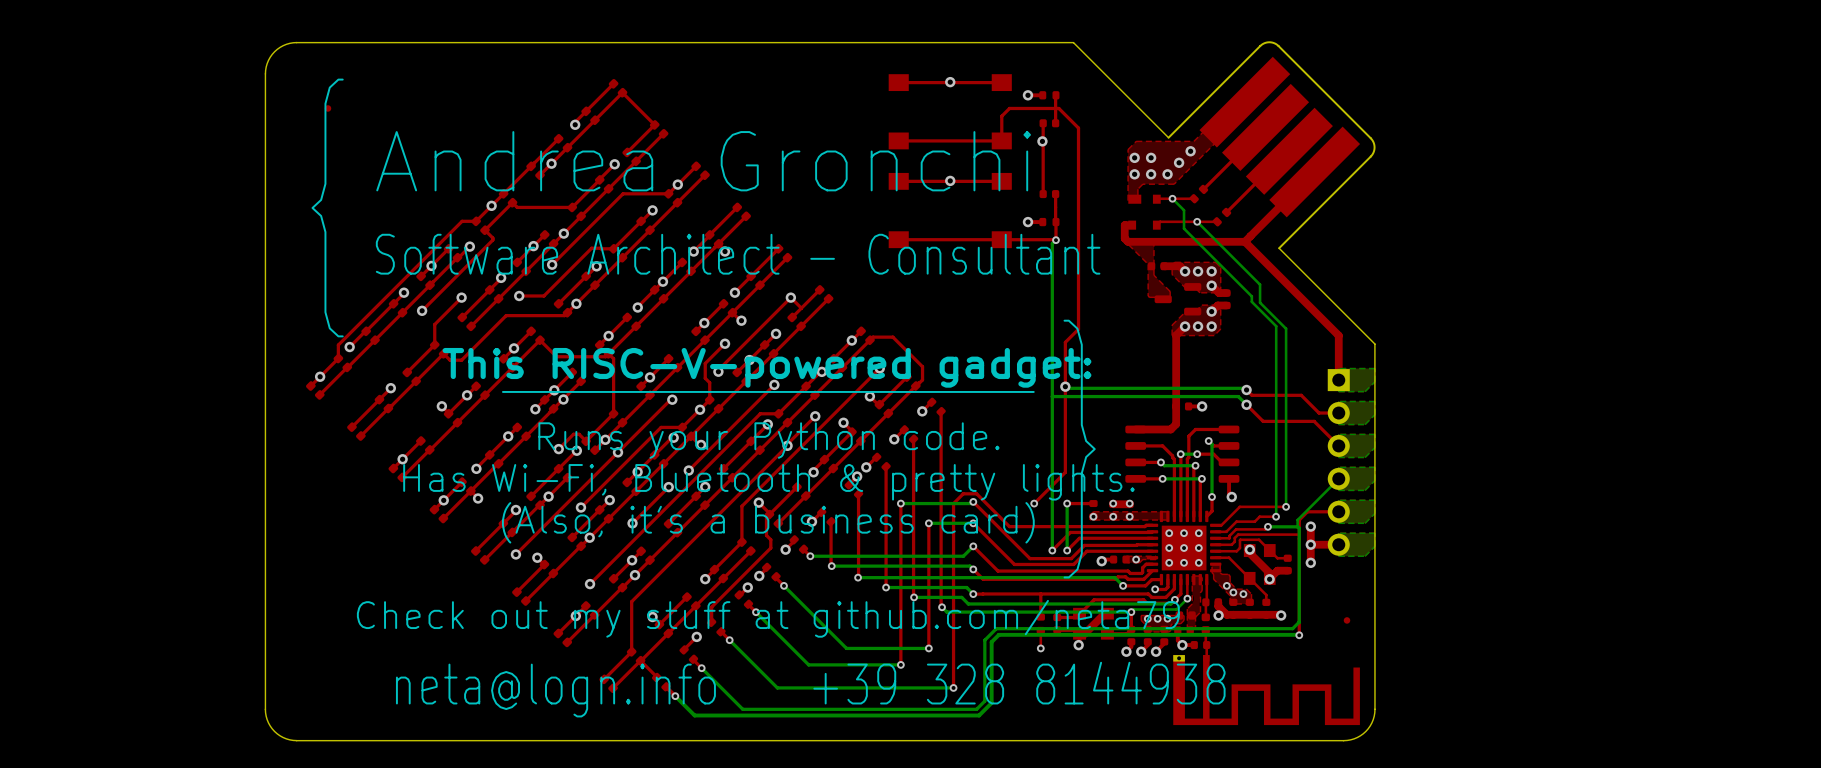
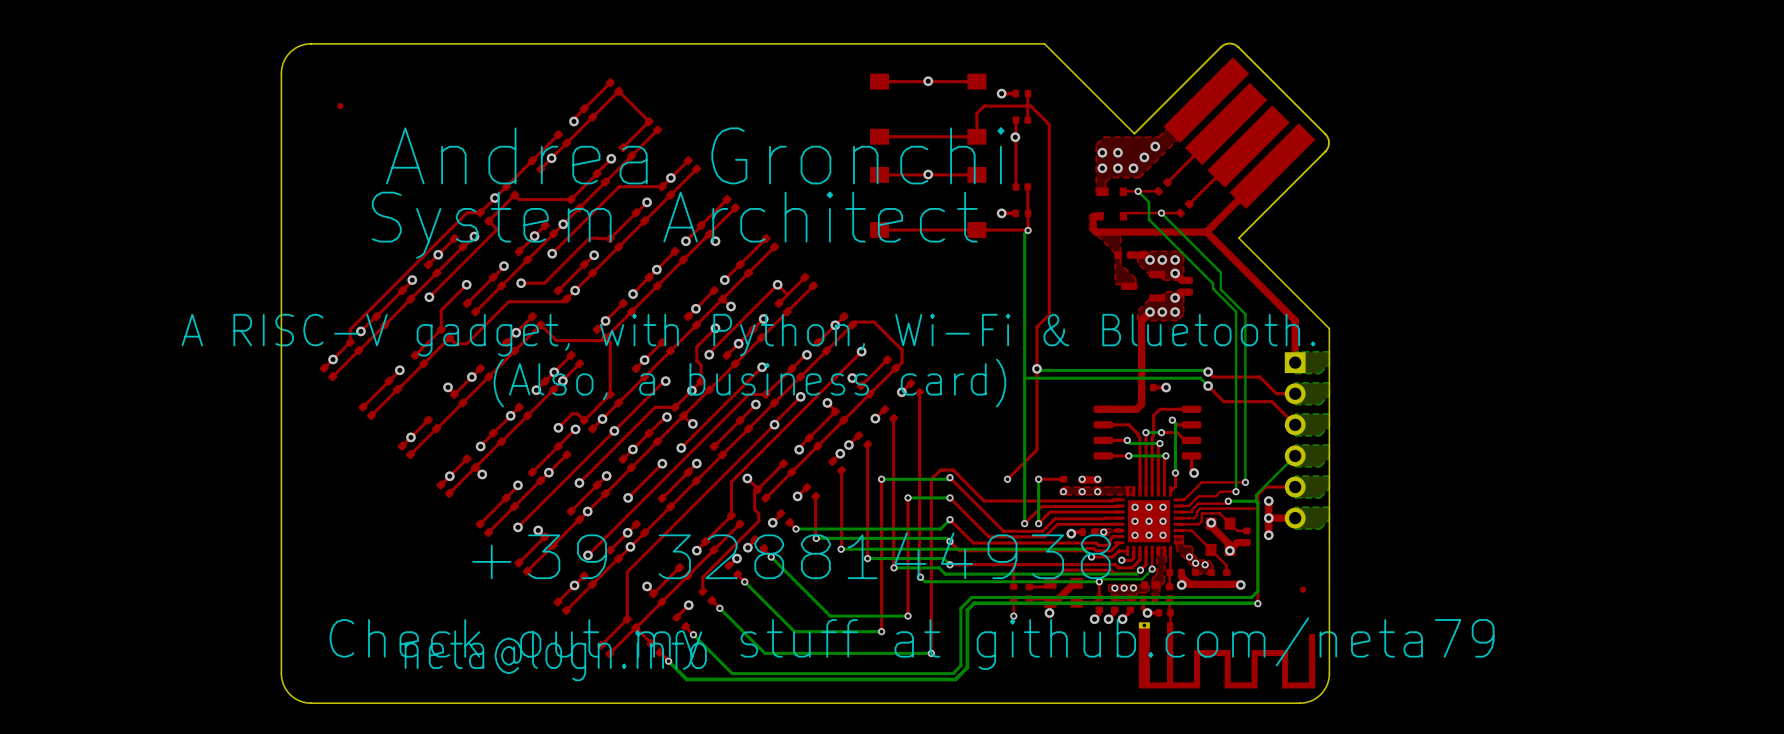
text: { (327, 207) -> none
text: none -> System Architect (674, 225)
text: Software Architect - Consultant (738, 254) -> none
text: none -> A RISC-V gadget, with Python, Wi-Fi & Bluetooth. (748, 335)
text: This RISC-V-powered gadget: (766, 367) -> none
line: (1033, 391) (502, 391) -> none
text: none -> (Also, a business card) (749, 383)
text: Runs your Python code. (768, 440) -> none
text: } (1079, 449) -> none
text: Has Wi-Fi, Bluetooth & pretty lights. (768, 482) -> none
text: (Also, it's a business card) (768, 522) -> none
text: none -> +39 3288144938 (791, 555)
text: Check out my stuff at github.com/neta79 (768, 618) -> none
text: none -> Check out my stuff at github.com/neta79 (912, 643)
text: +39 328 8144938 (1019, 683) -> none

